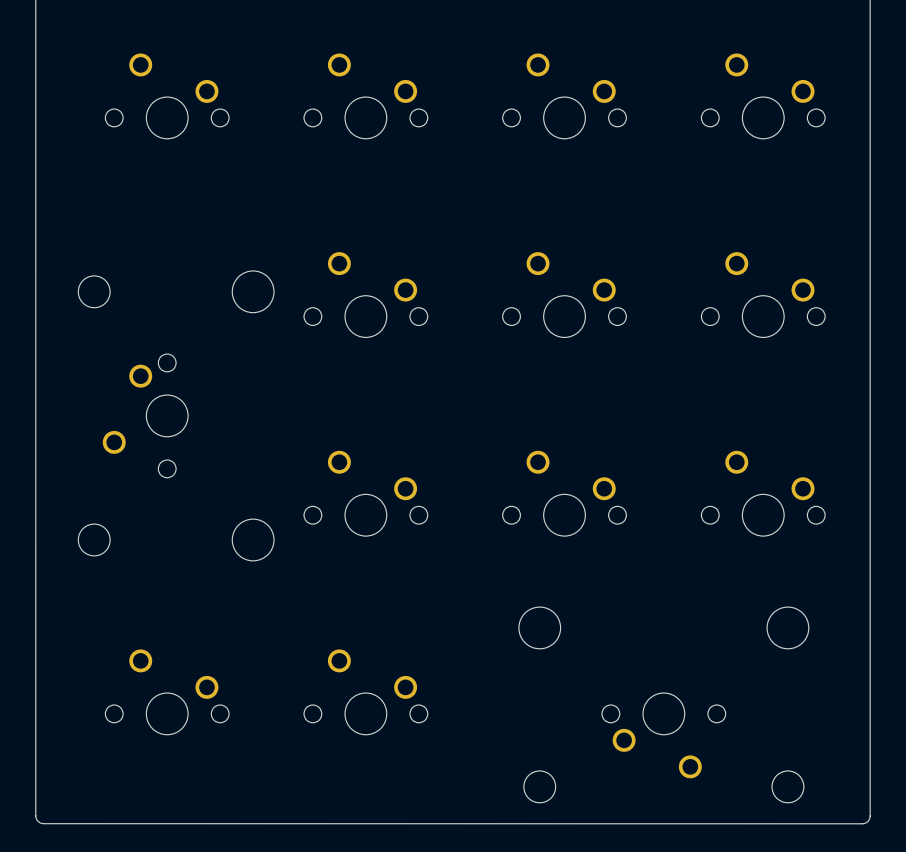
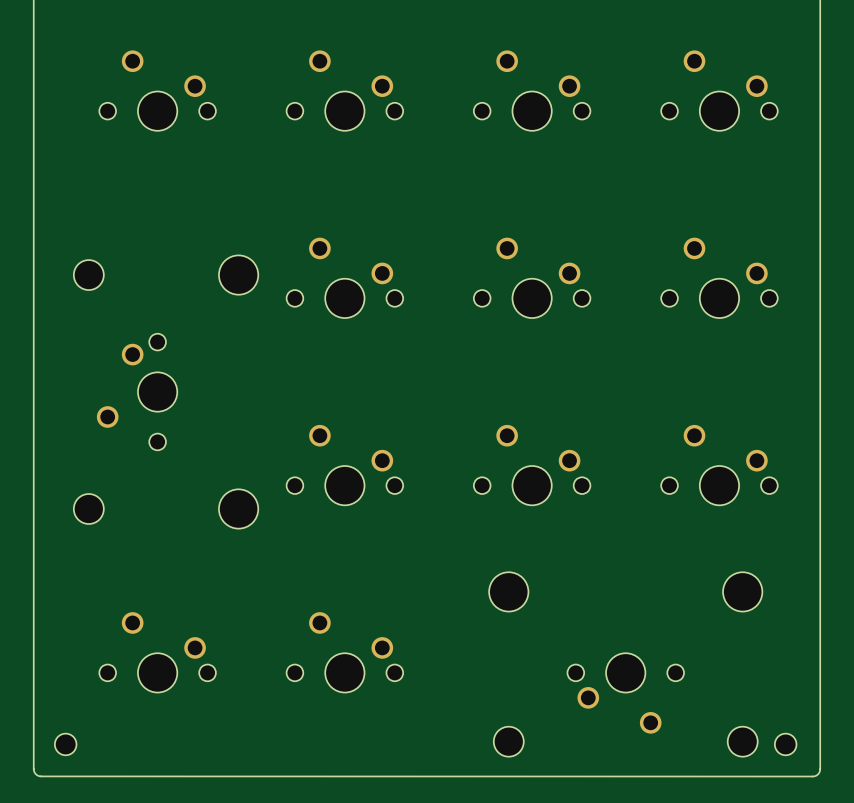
part: none -> (65, 744)
part: none -> (785, 744)

